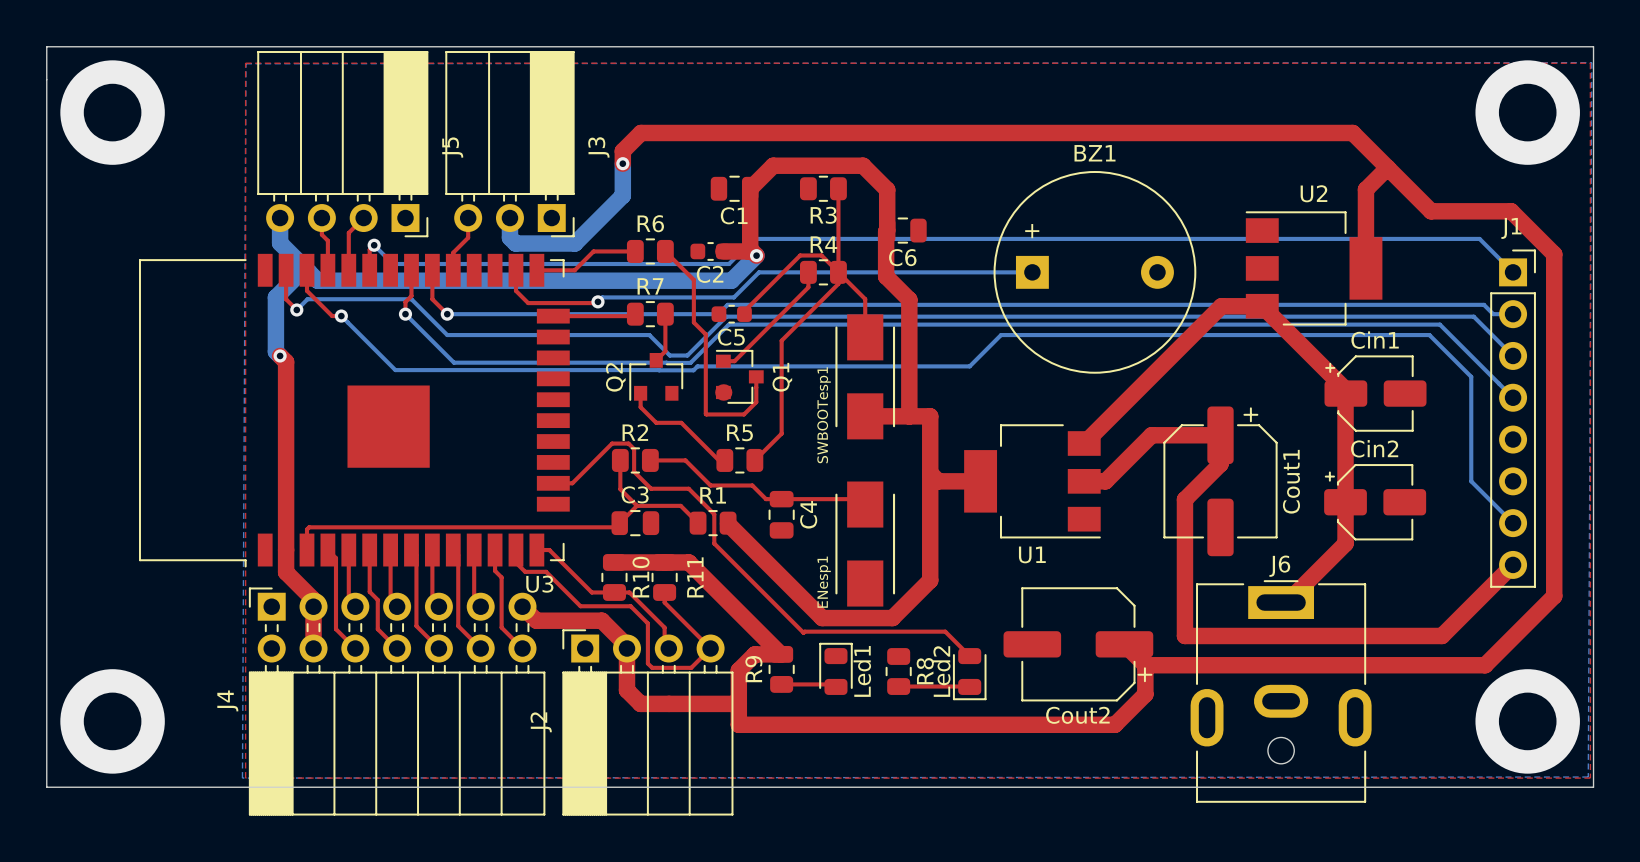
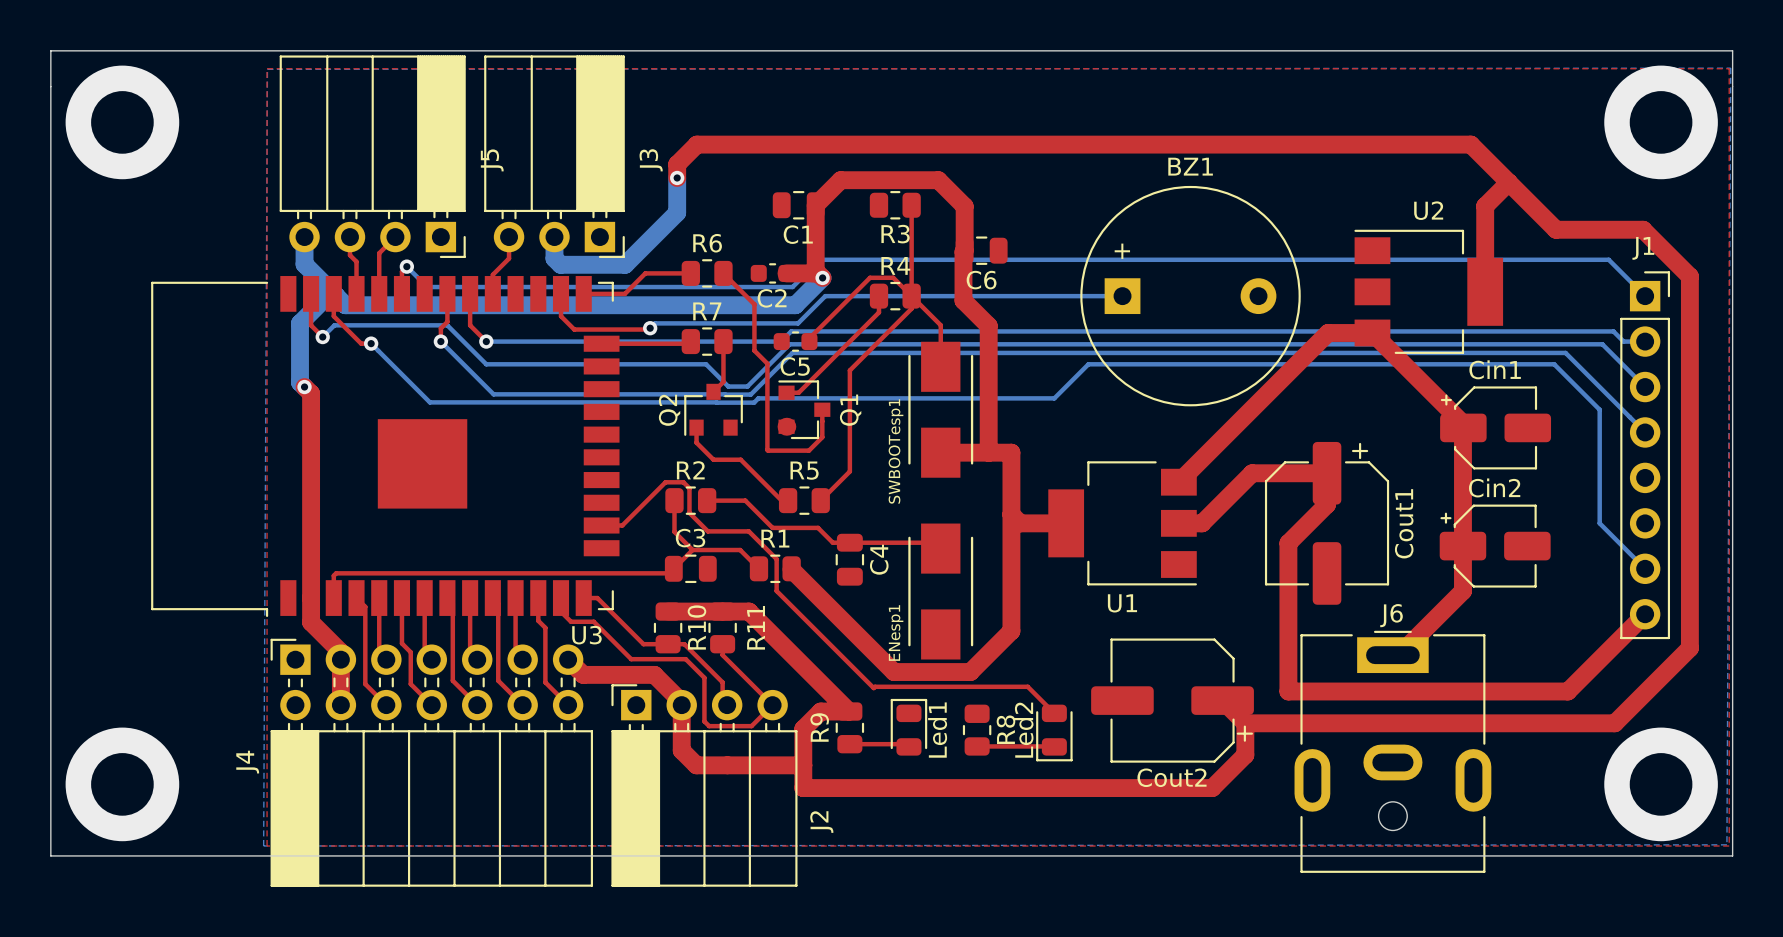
J2 name position: J2 (541, 722) -> J2 (821, 822)

